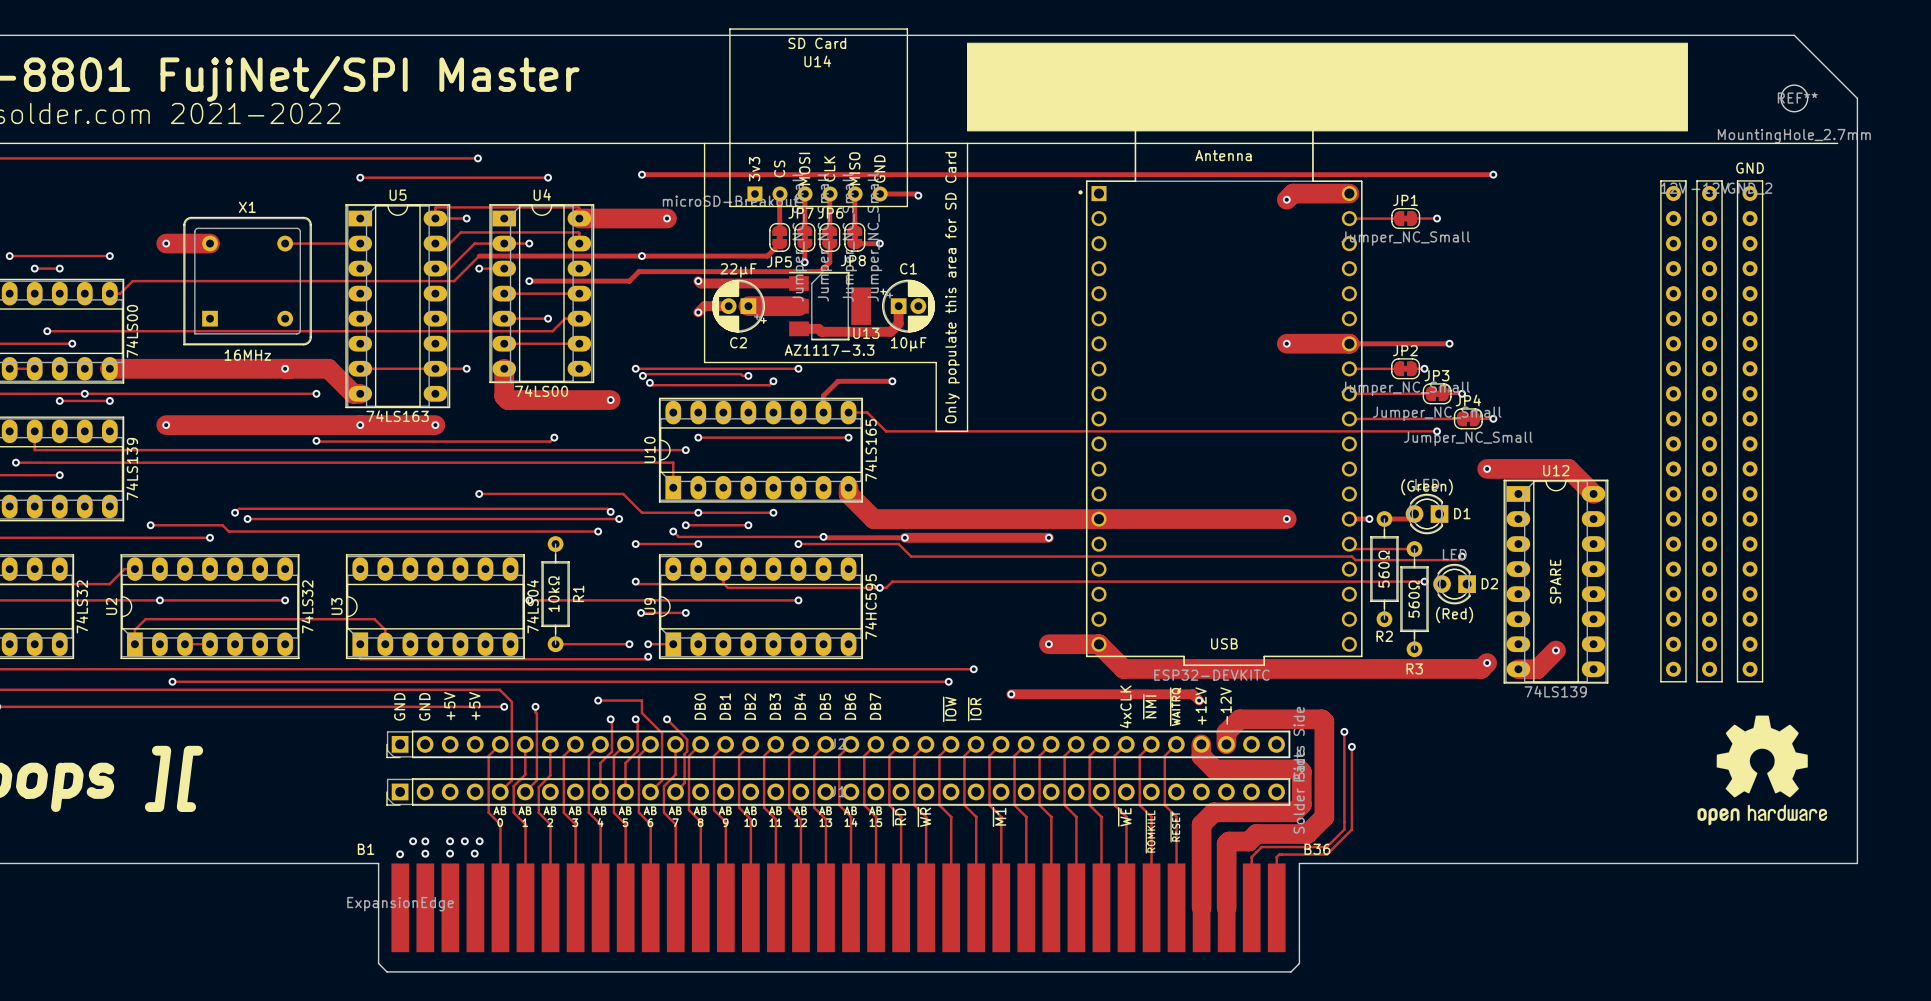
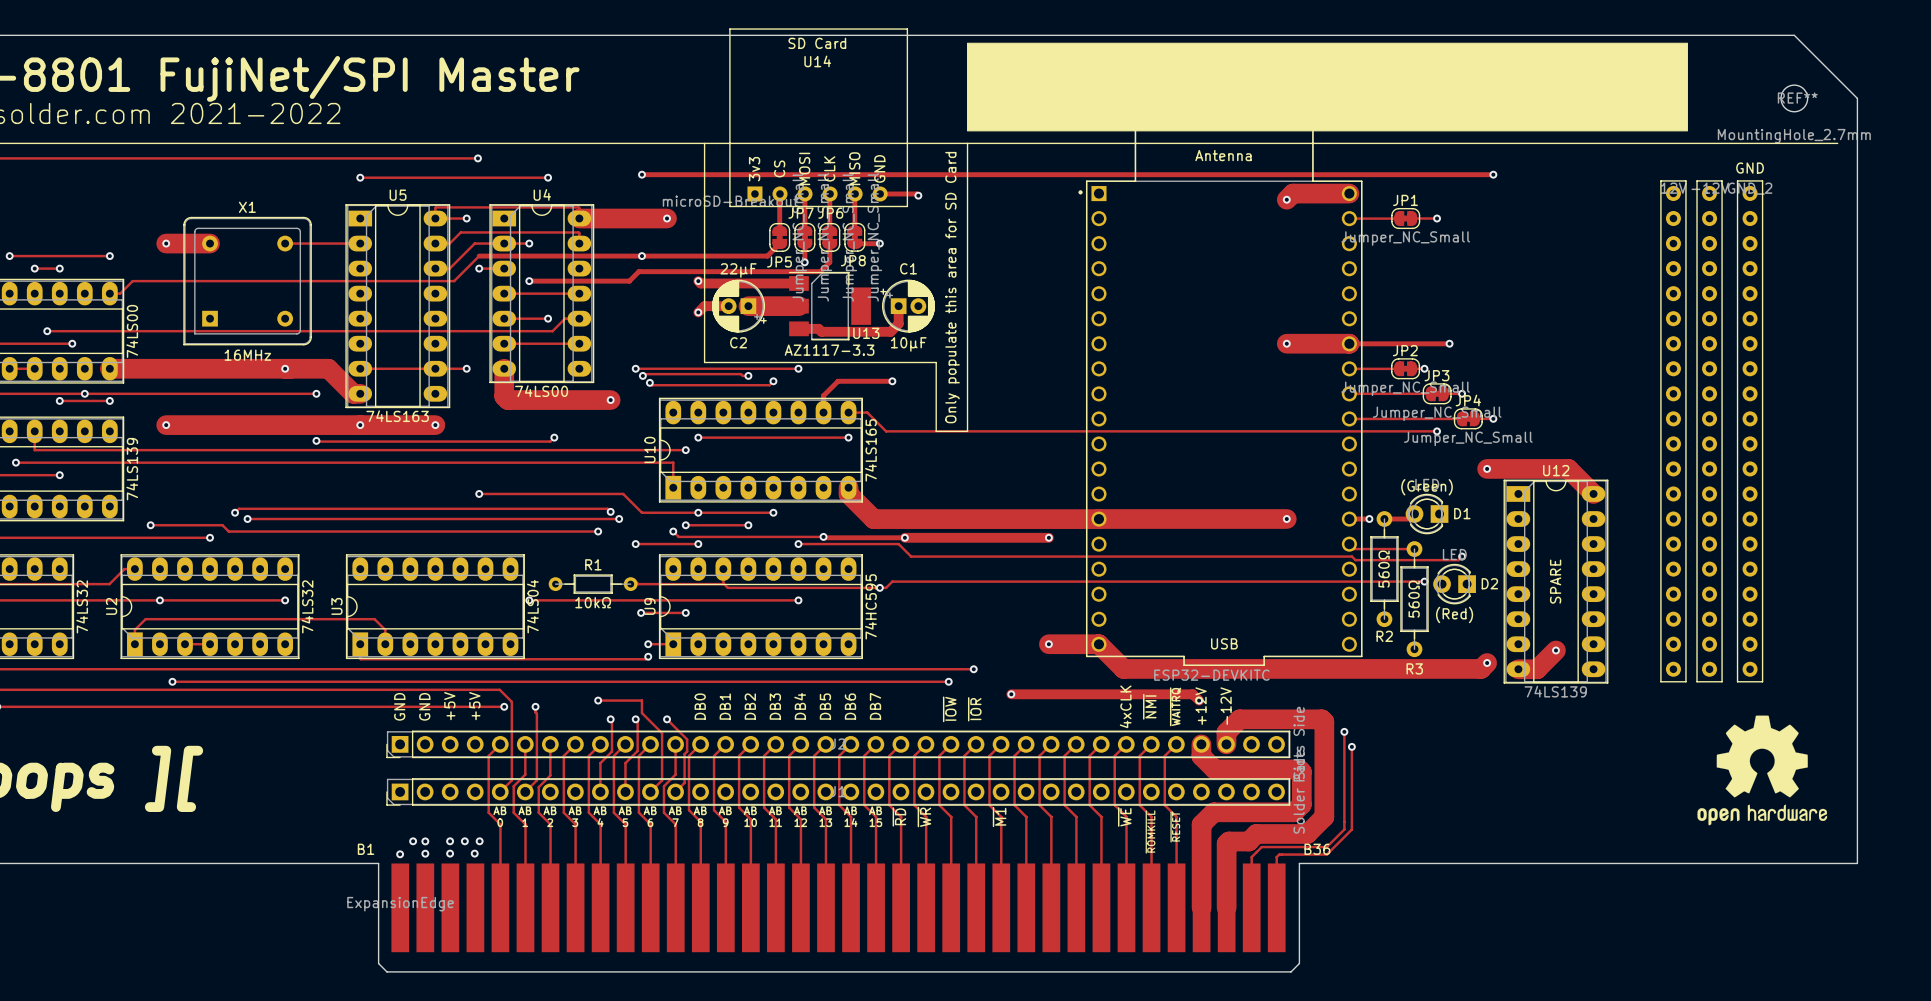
R1 footprint: [541, 536, 570, 653] -> [548, 574, 638, 594]
via: (635, 581) -> none
R1 name position: R1 (578, 593) -> R1 (593, 564)
track: (555, 644) (629, 644) -> none
via: (629, 644) -> none

